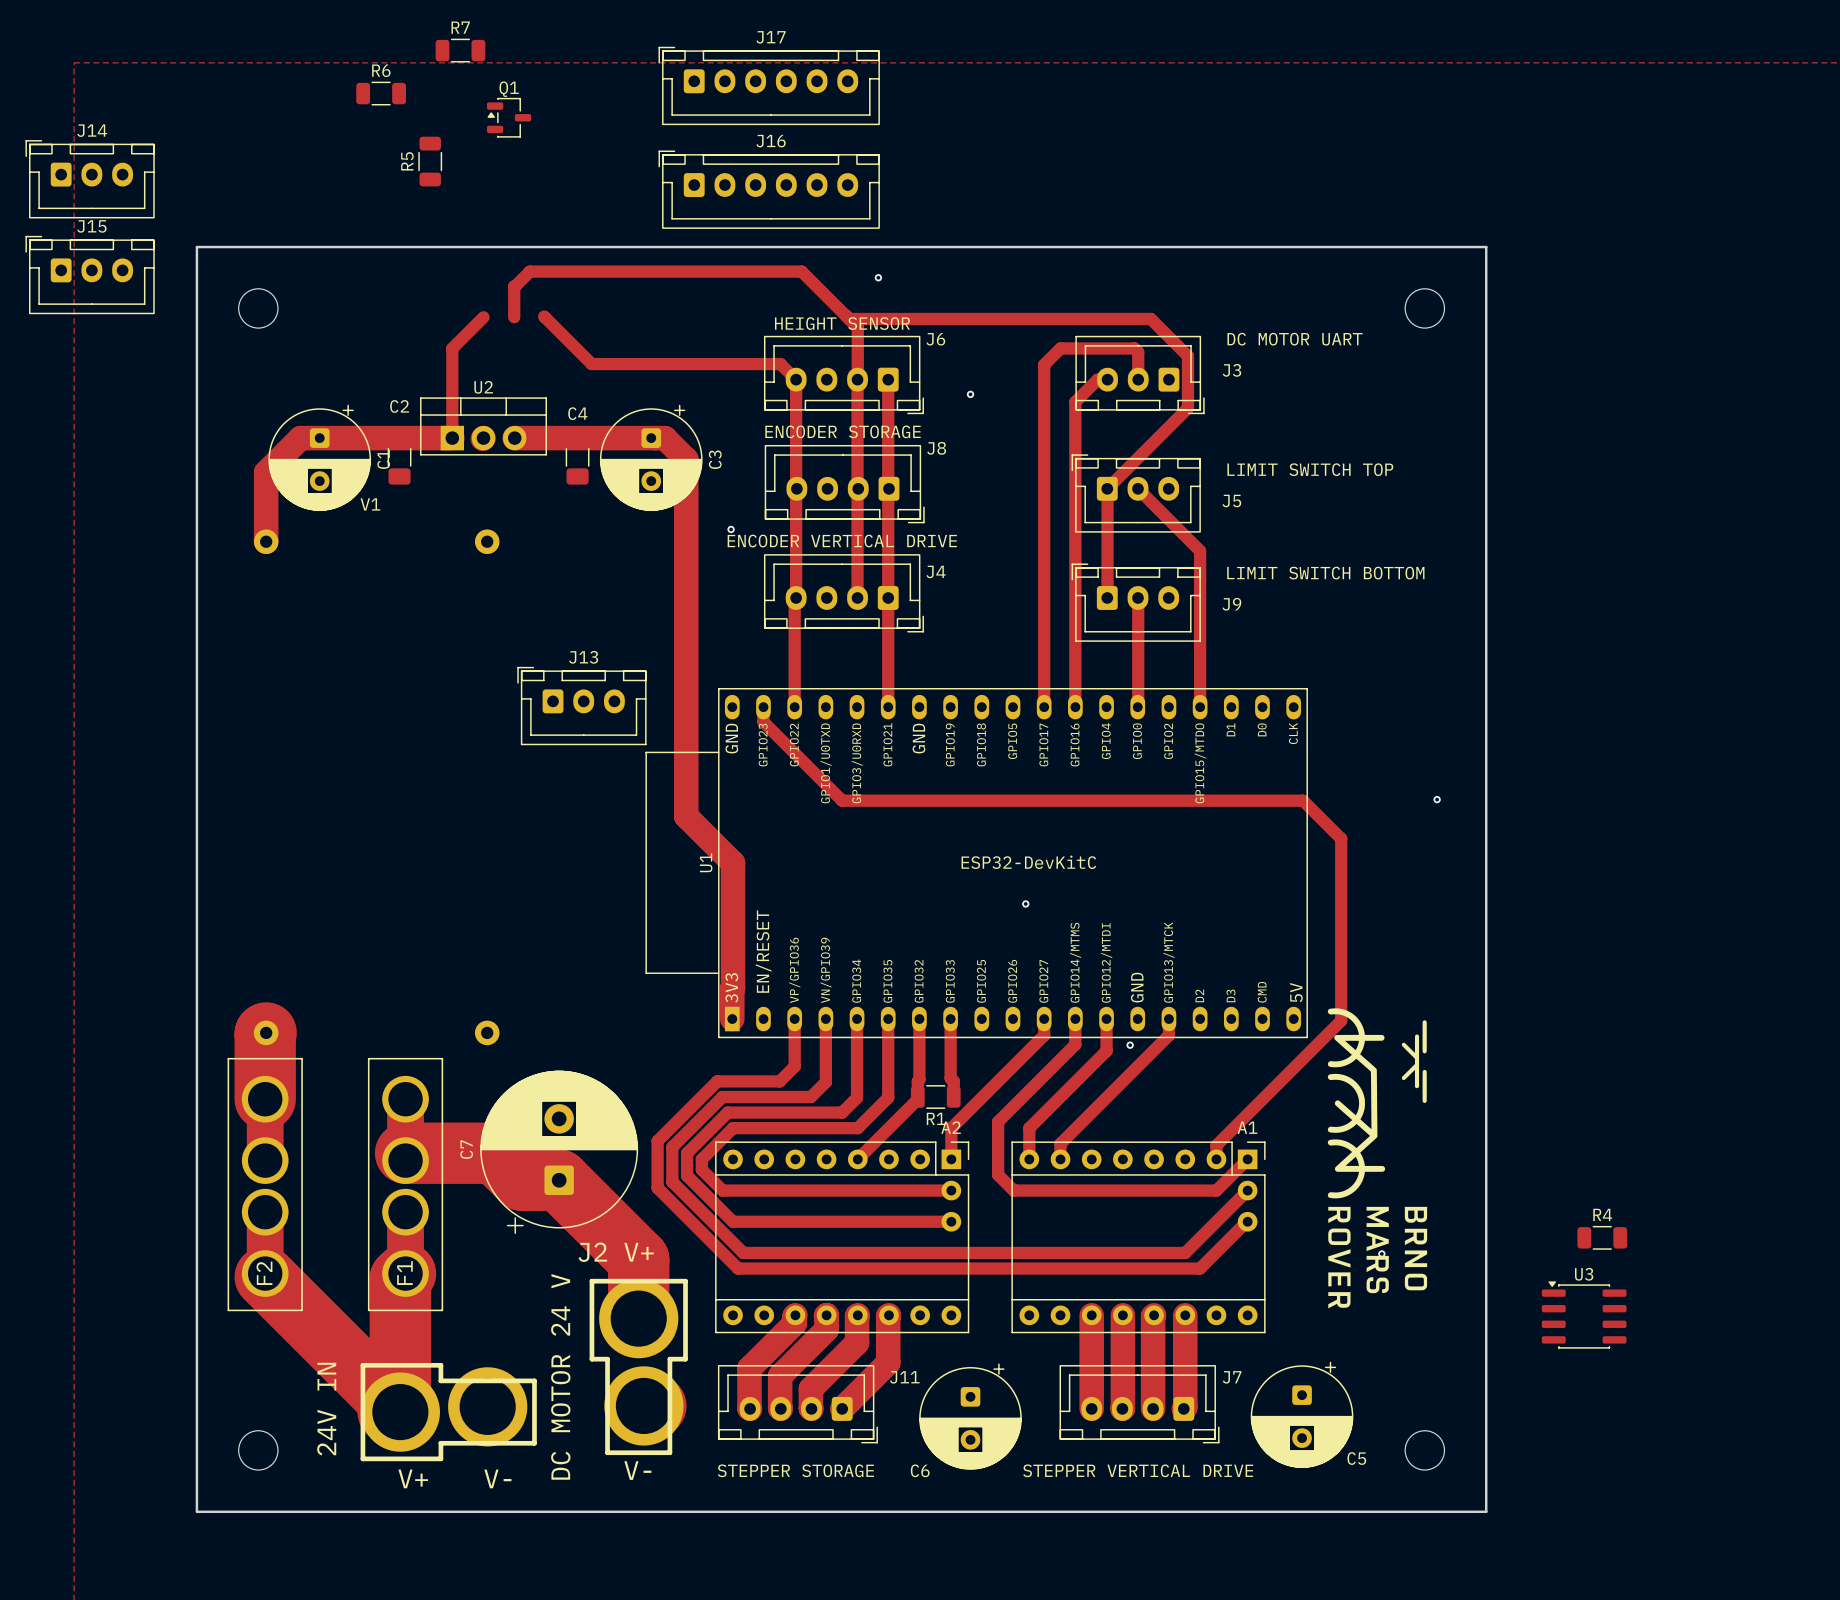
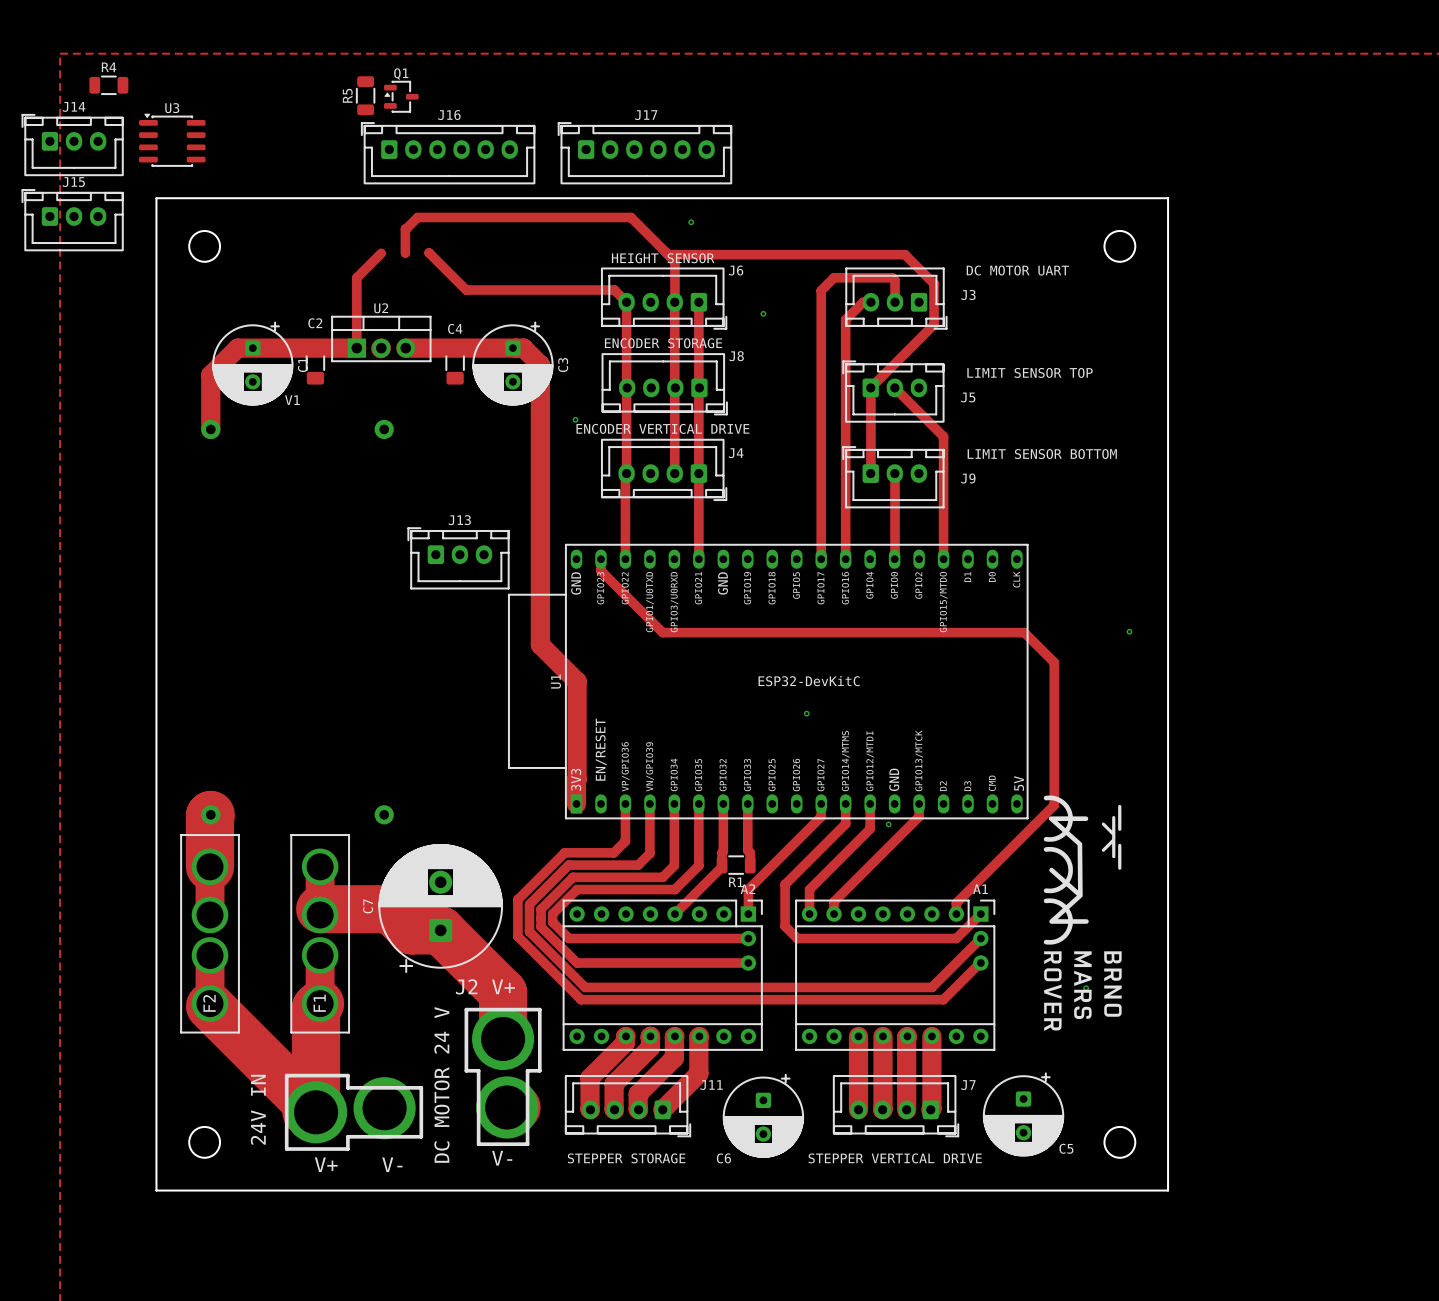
R7: (460, 50) -> none
J17 position: (769, 85) -> (644, 153)
R6: (381, 93) -> none
R5 position: (430, 161) -> (365, 95)
J16 position: (769, 189) -> (448, 153)
J5 value: LIMIT SWITCH TOP (1310, 469) -> LIMIT SENSOR TOP (1030, 372)
J9 value: LIMIT SWITCH BOTTOM (1325, 573) -> LIMIT SENSOR BOTTOM (1042, 454)
R4 position: (1602, 1237) -> (108, 85)
U3 position: (1584, 1315) -> (172, 140)

